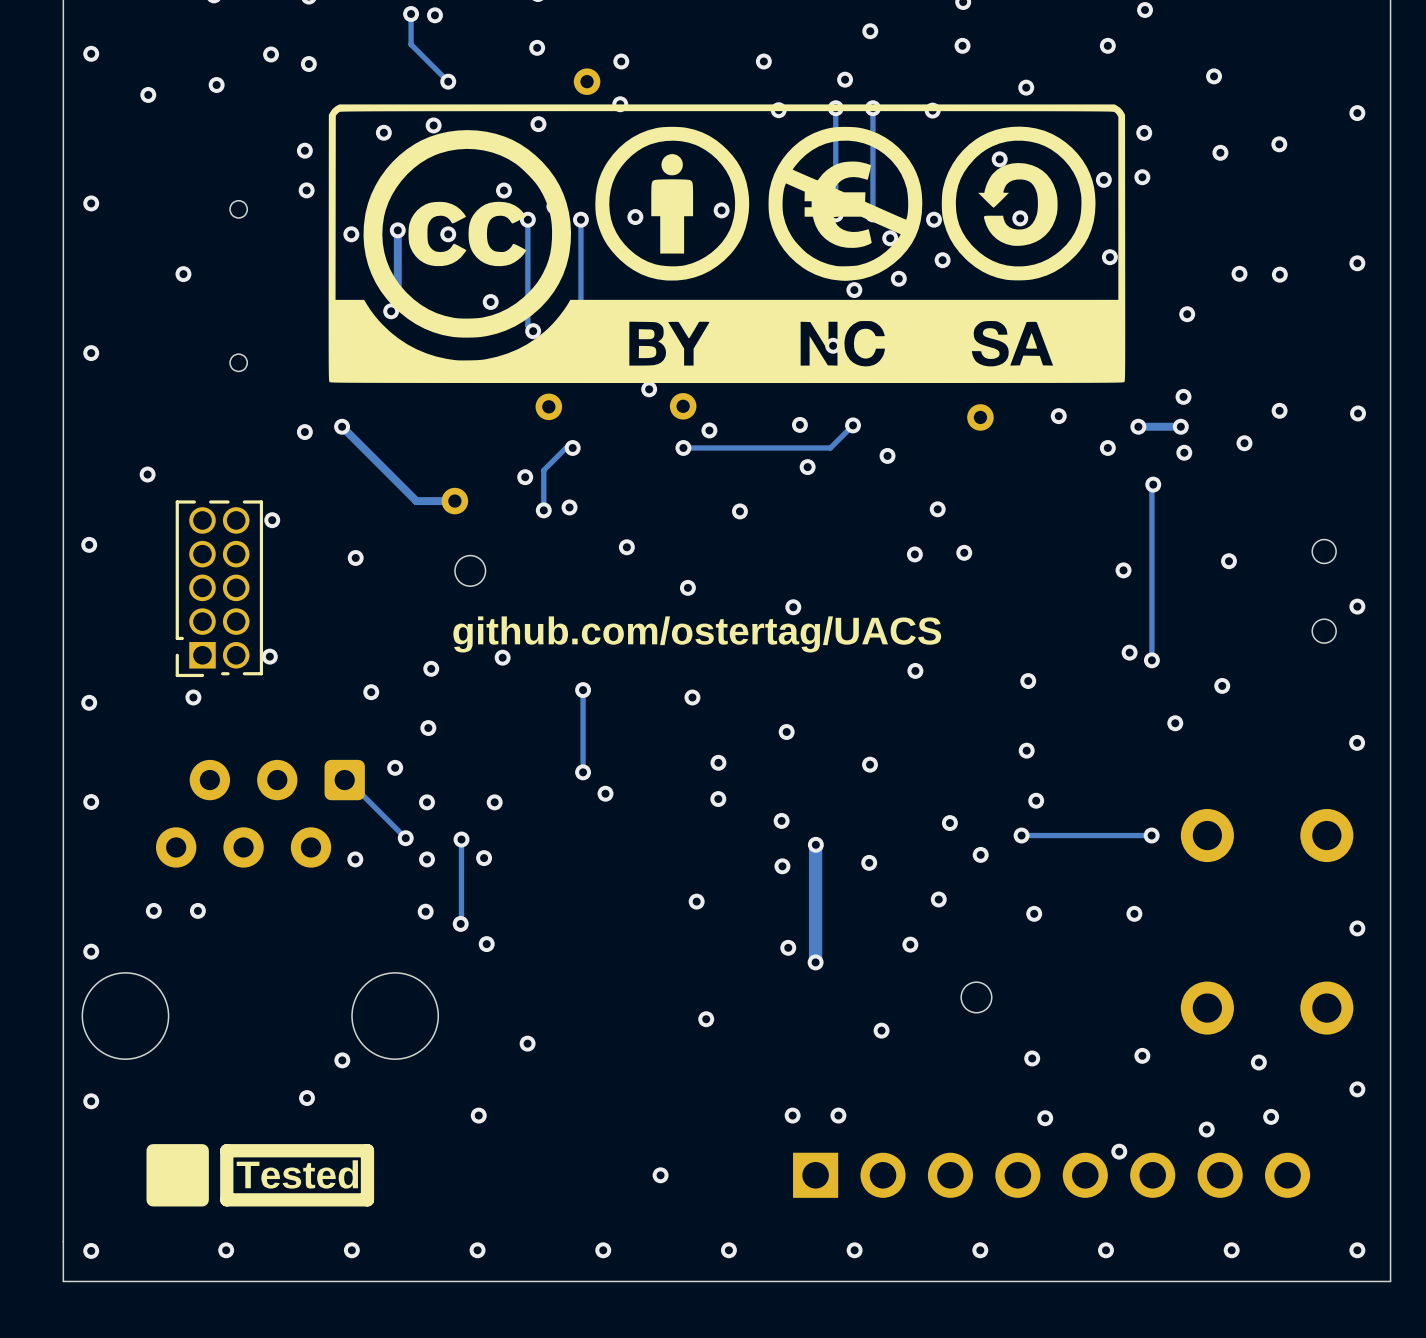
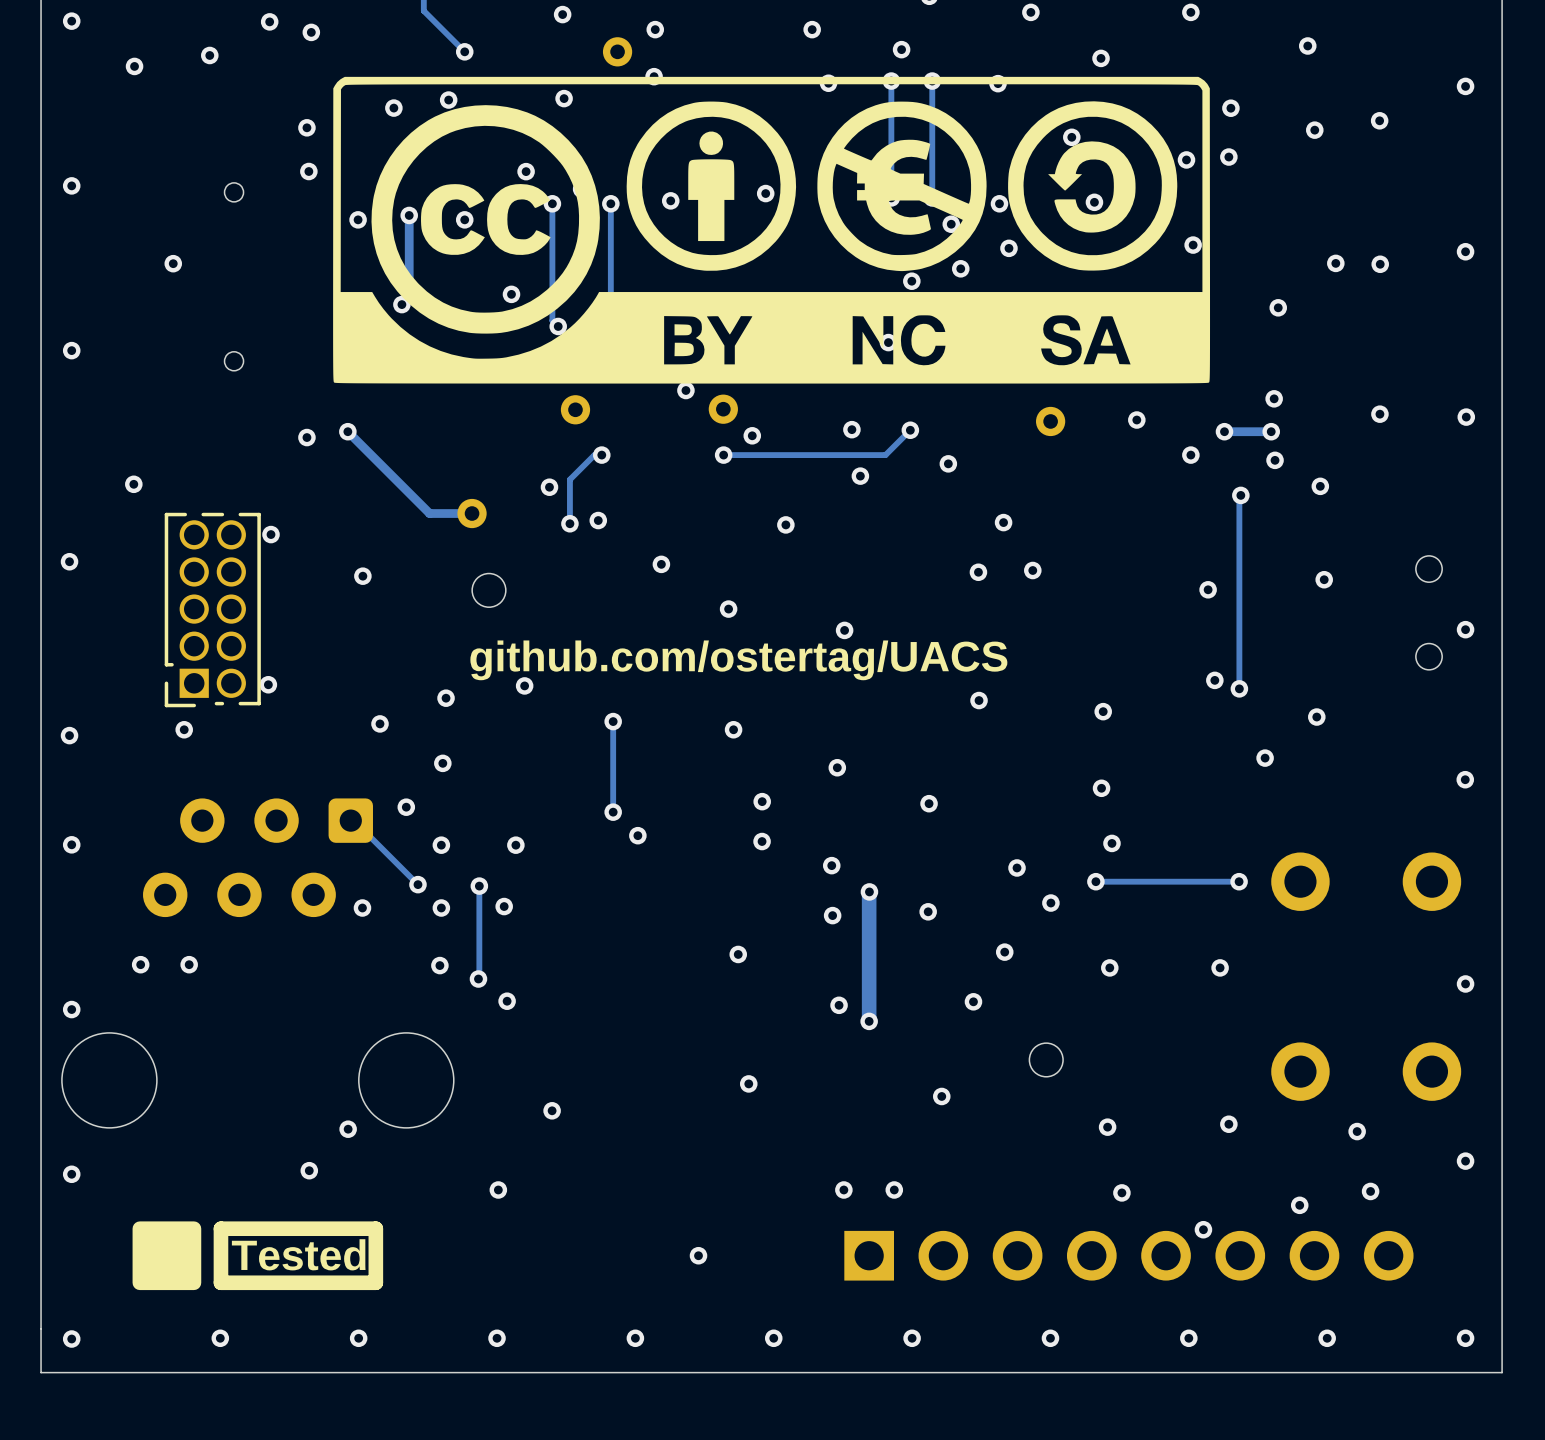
via position: (1244, 443) -> (1320, 486)

